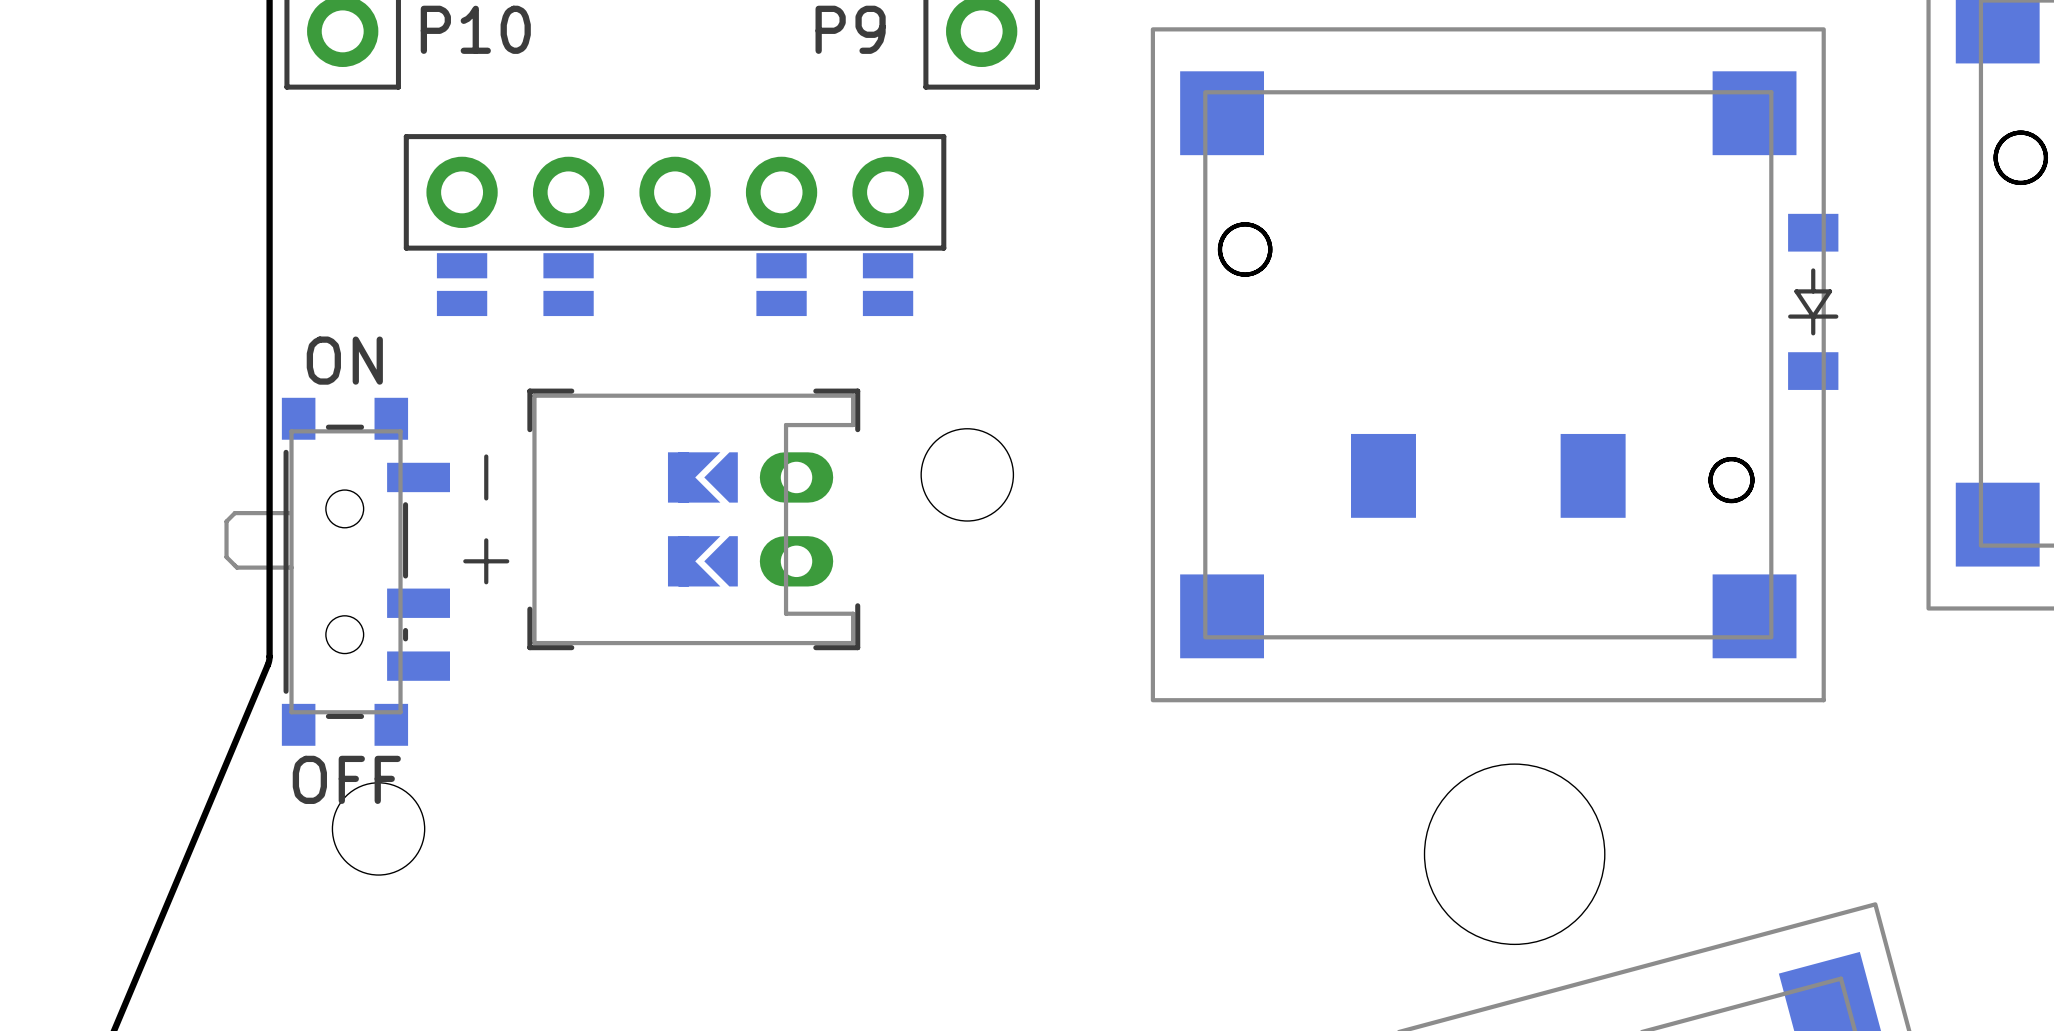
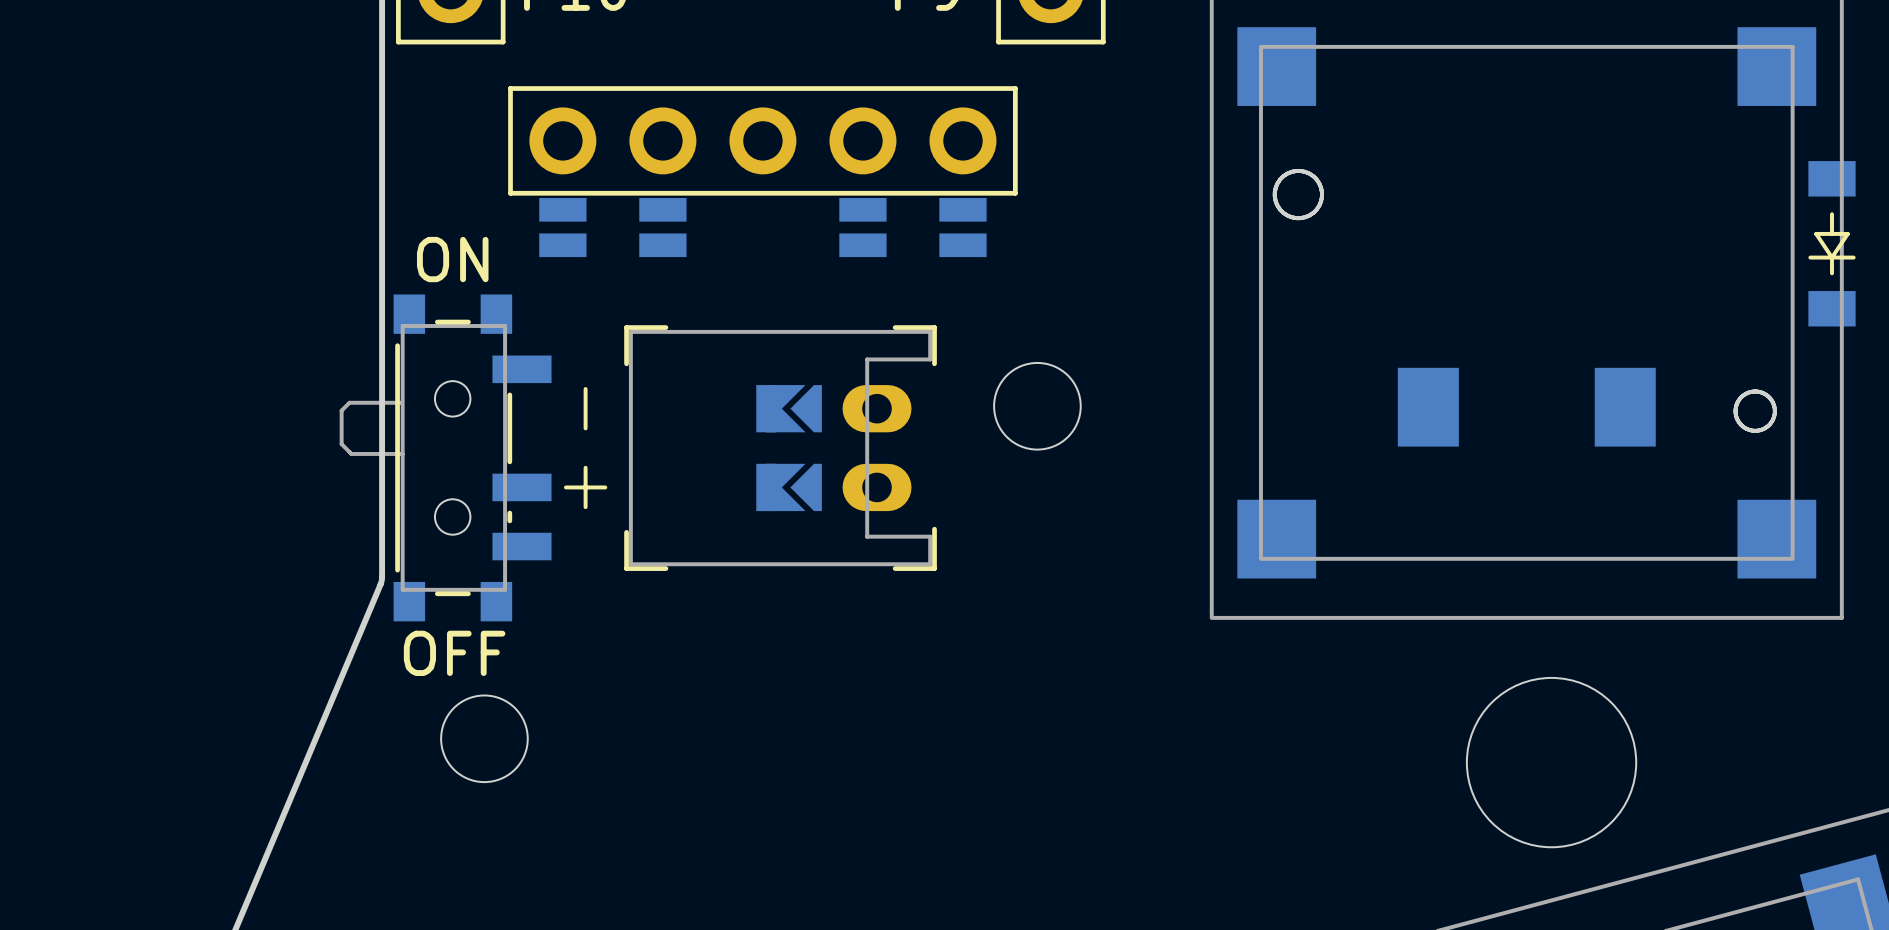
part position: (337, 571) -> (445, 457)

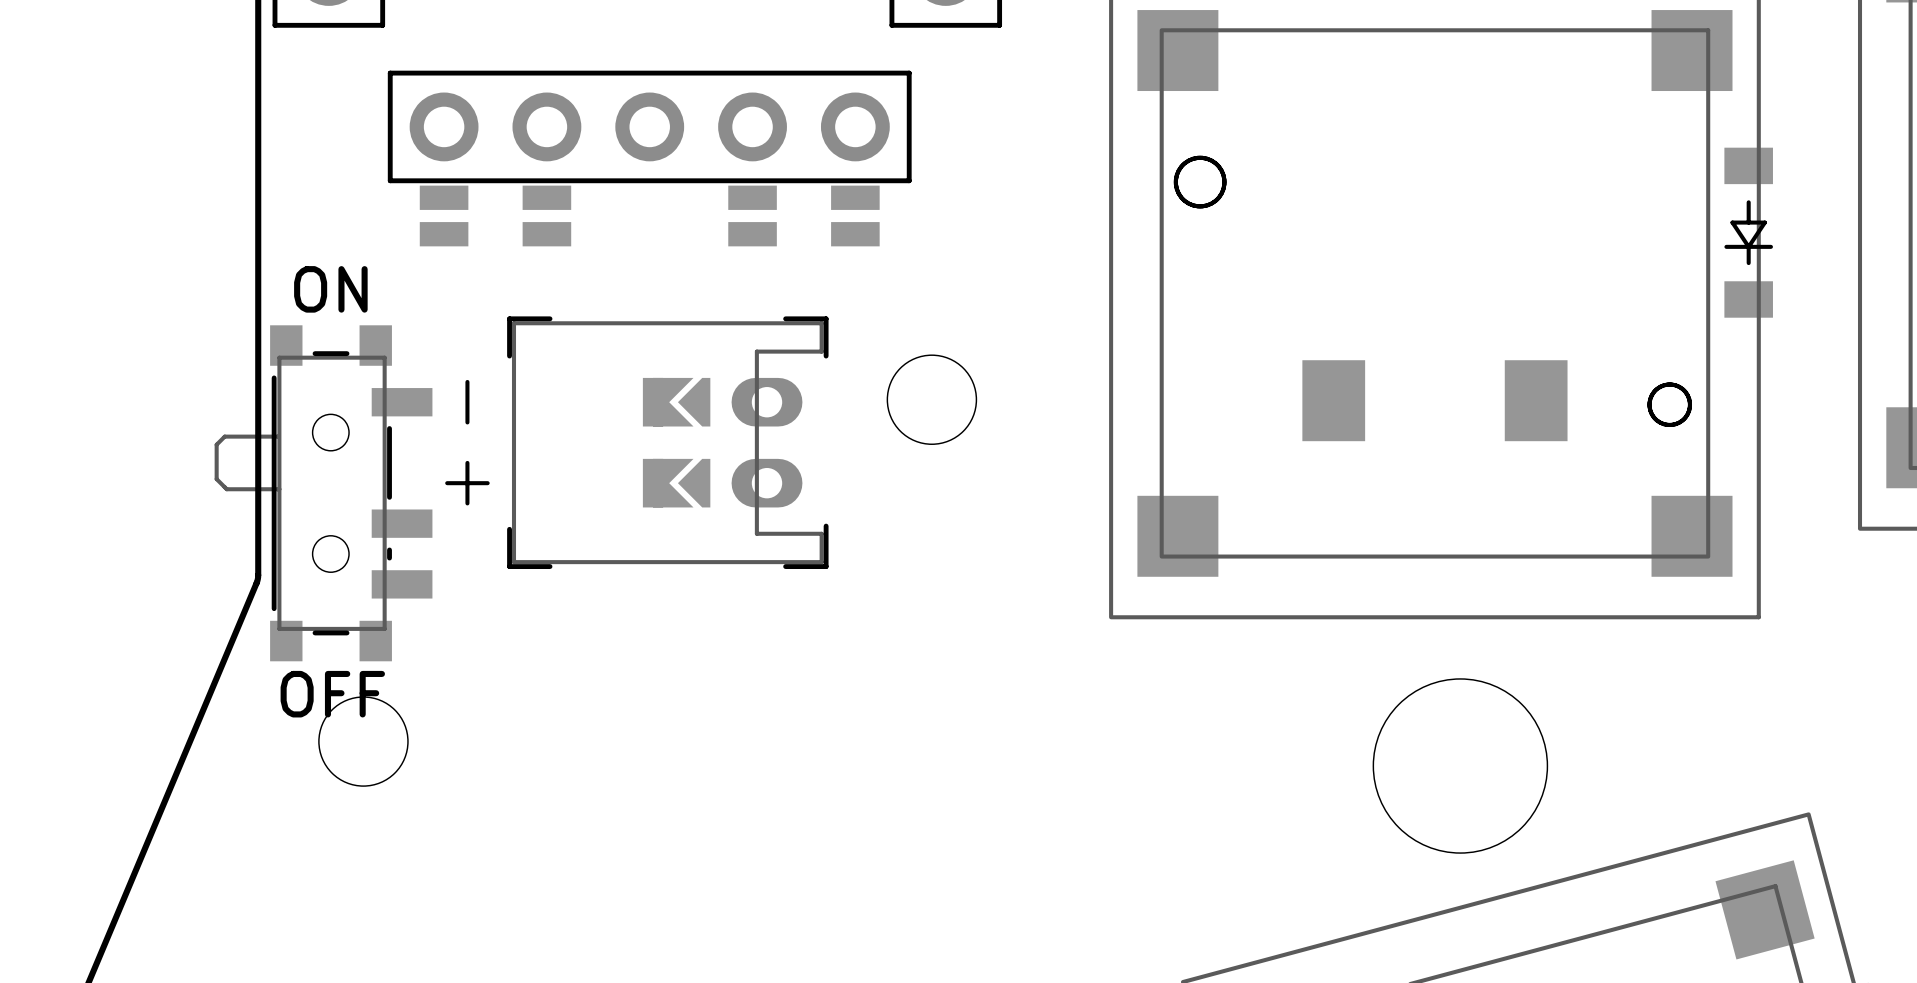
part position: (445, 457) -> (323, 493)

